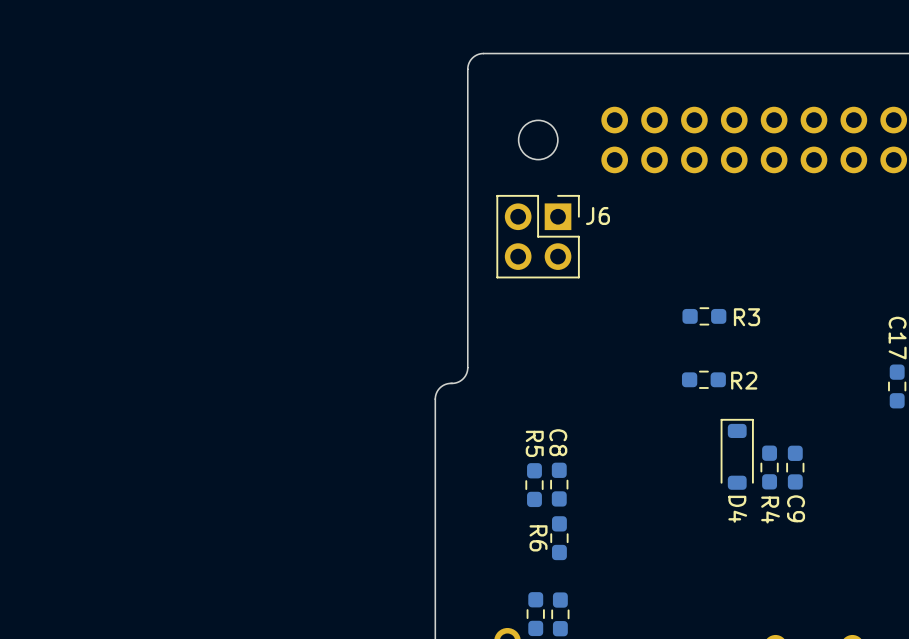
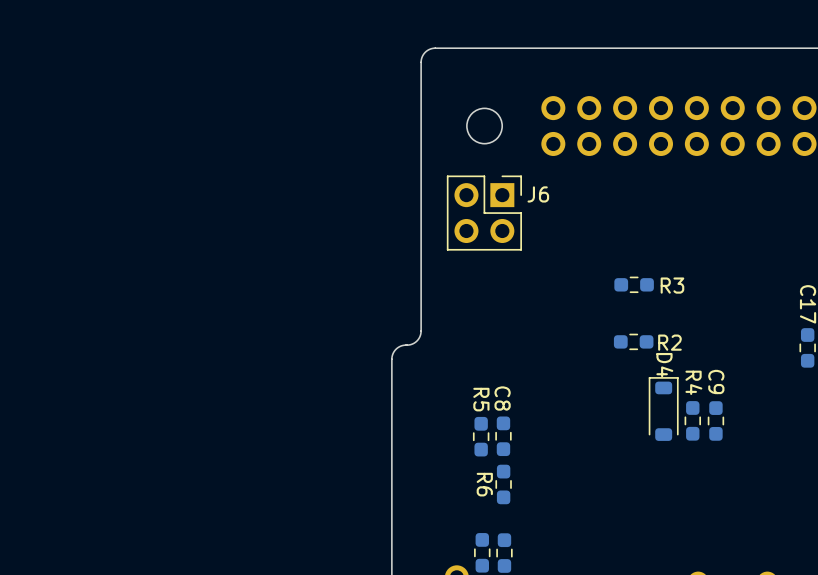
C9 name position: C9 (796, 508) -> C9 (716, 381)
D4 name position: D4 (737, 509) -> D4 (664, 365)
R4 name position: R4 (770, 510) -> R4 (693, 382)

